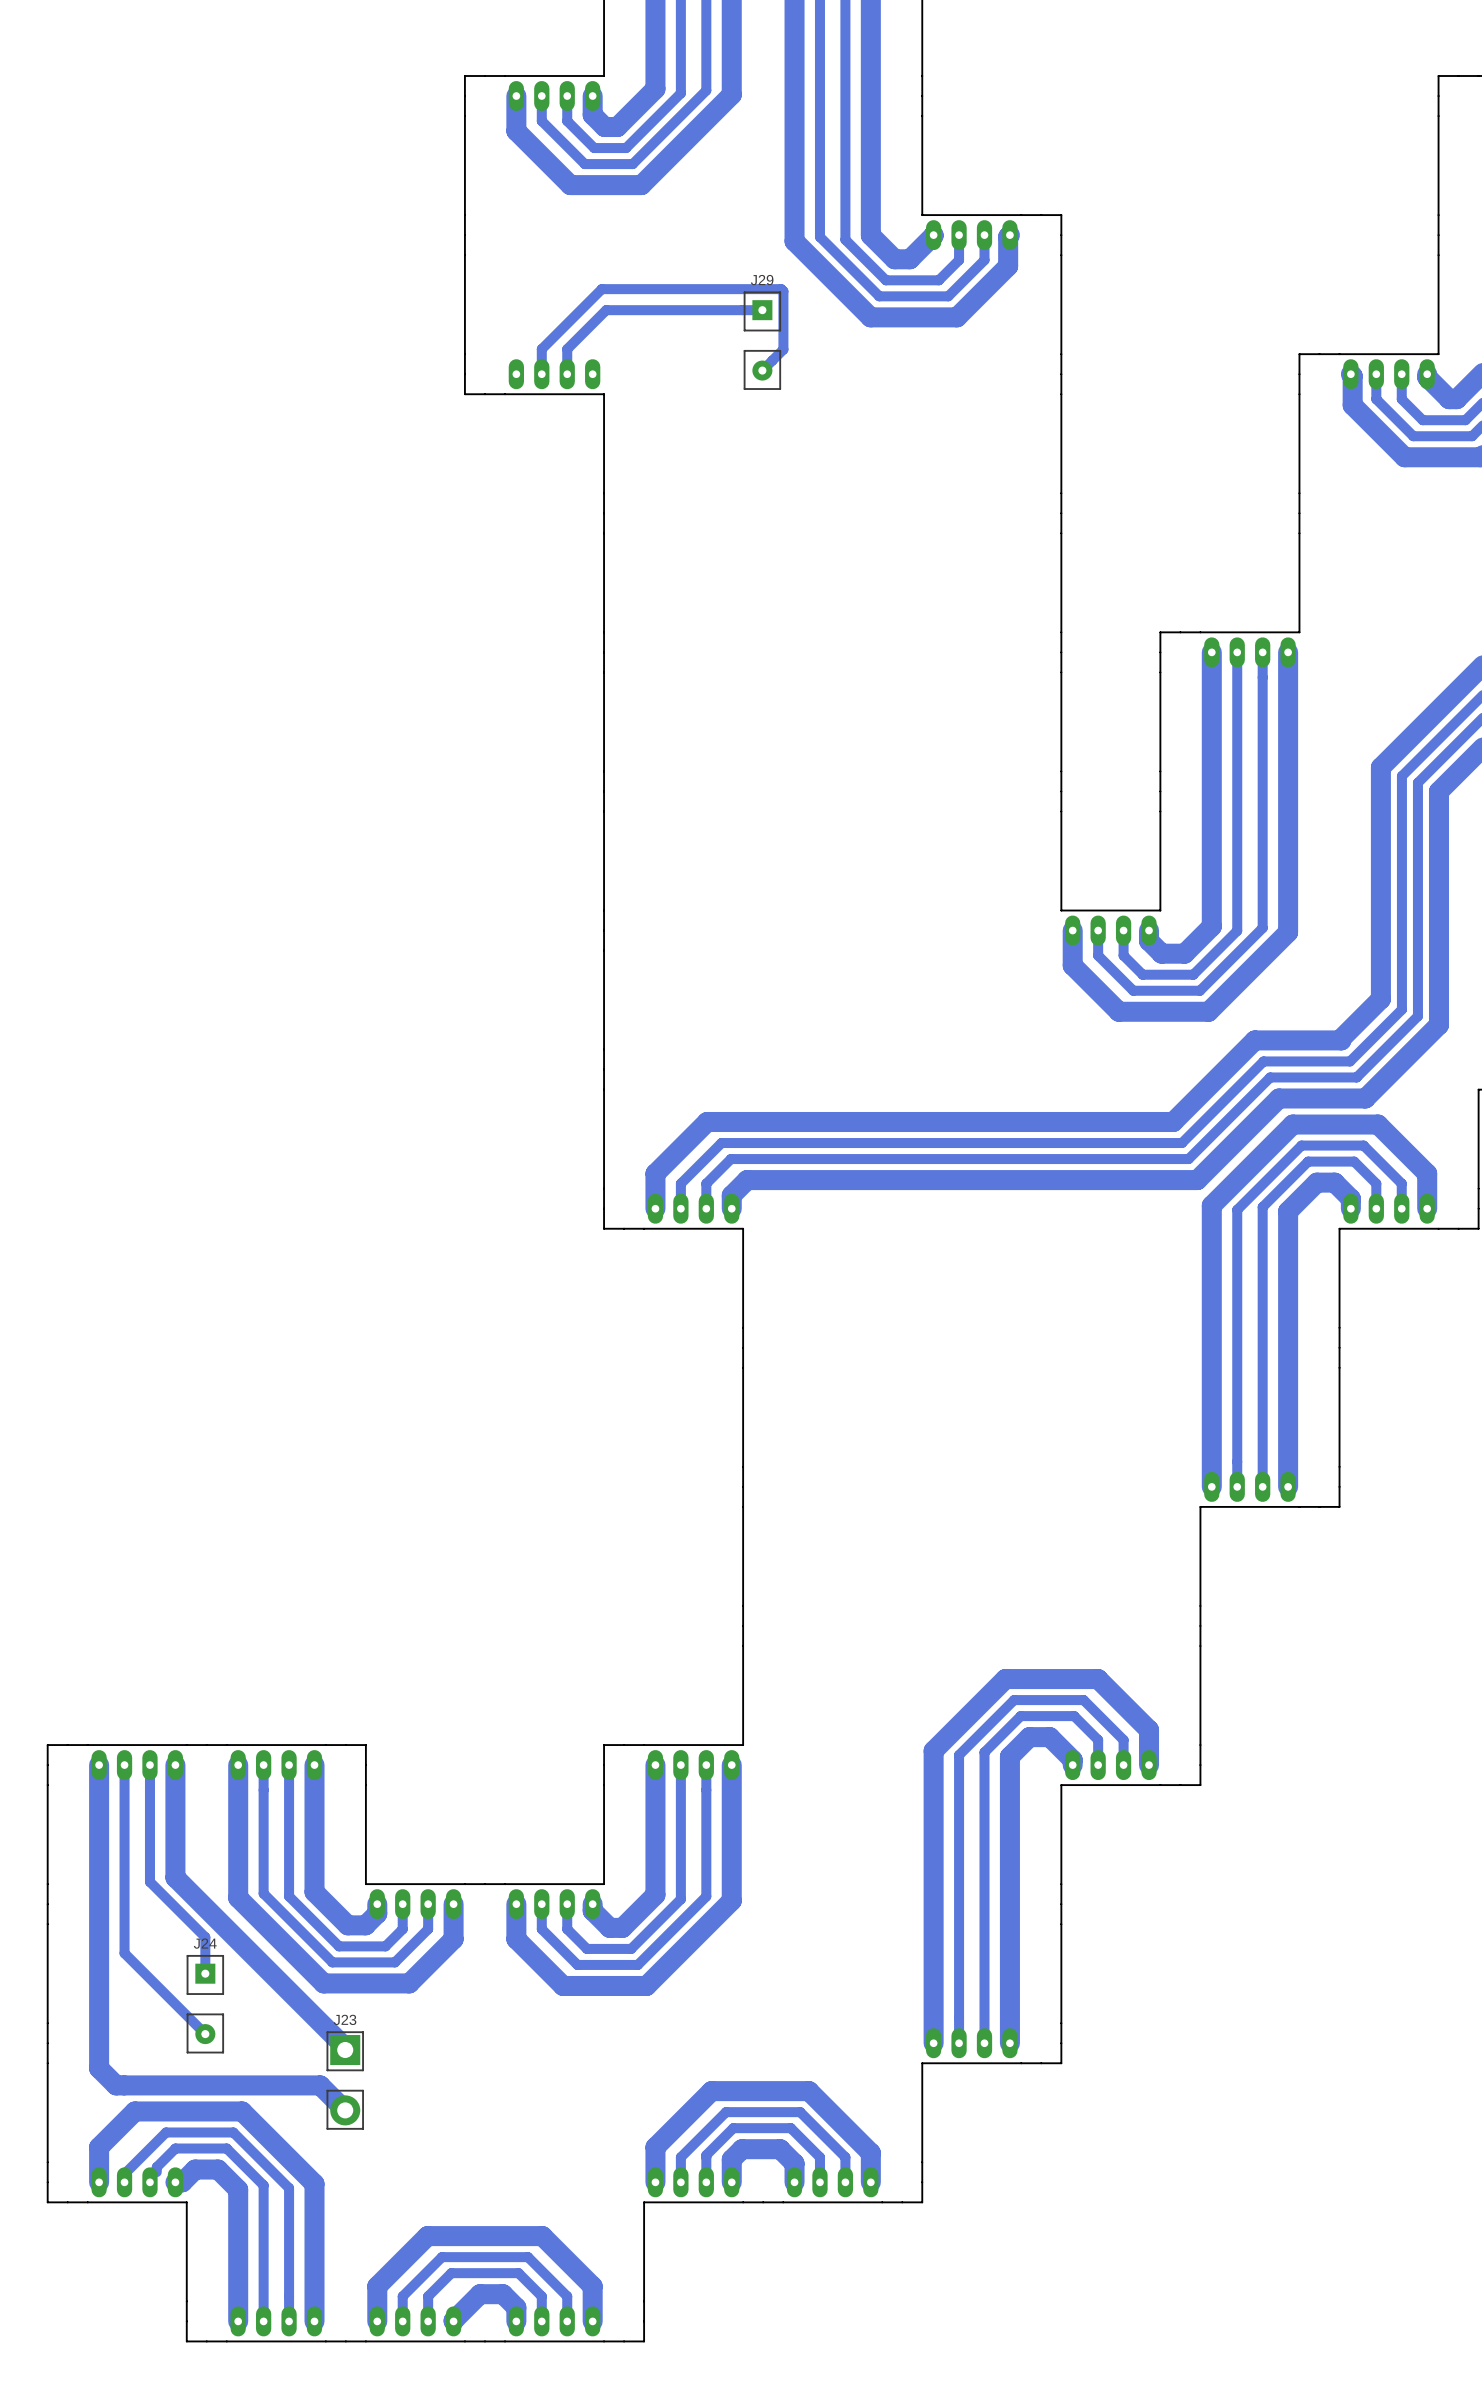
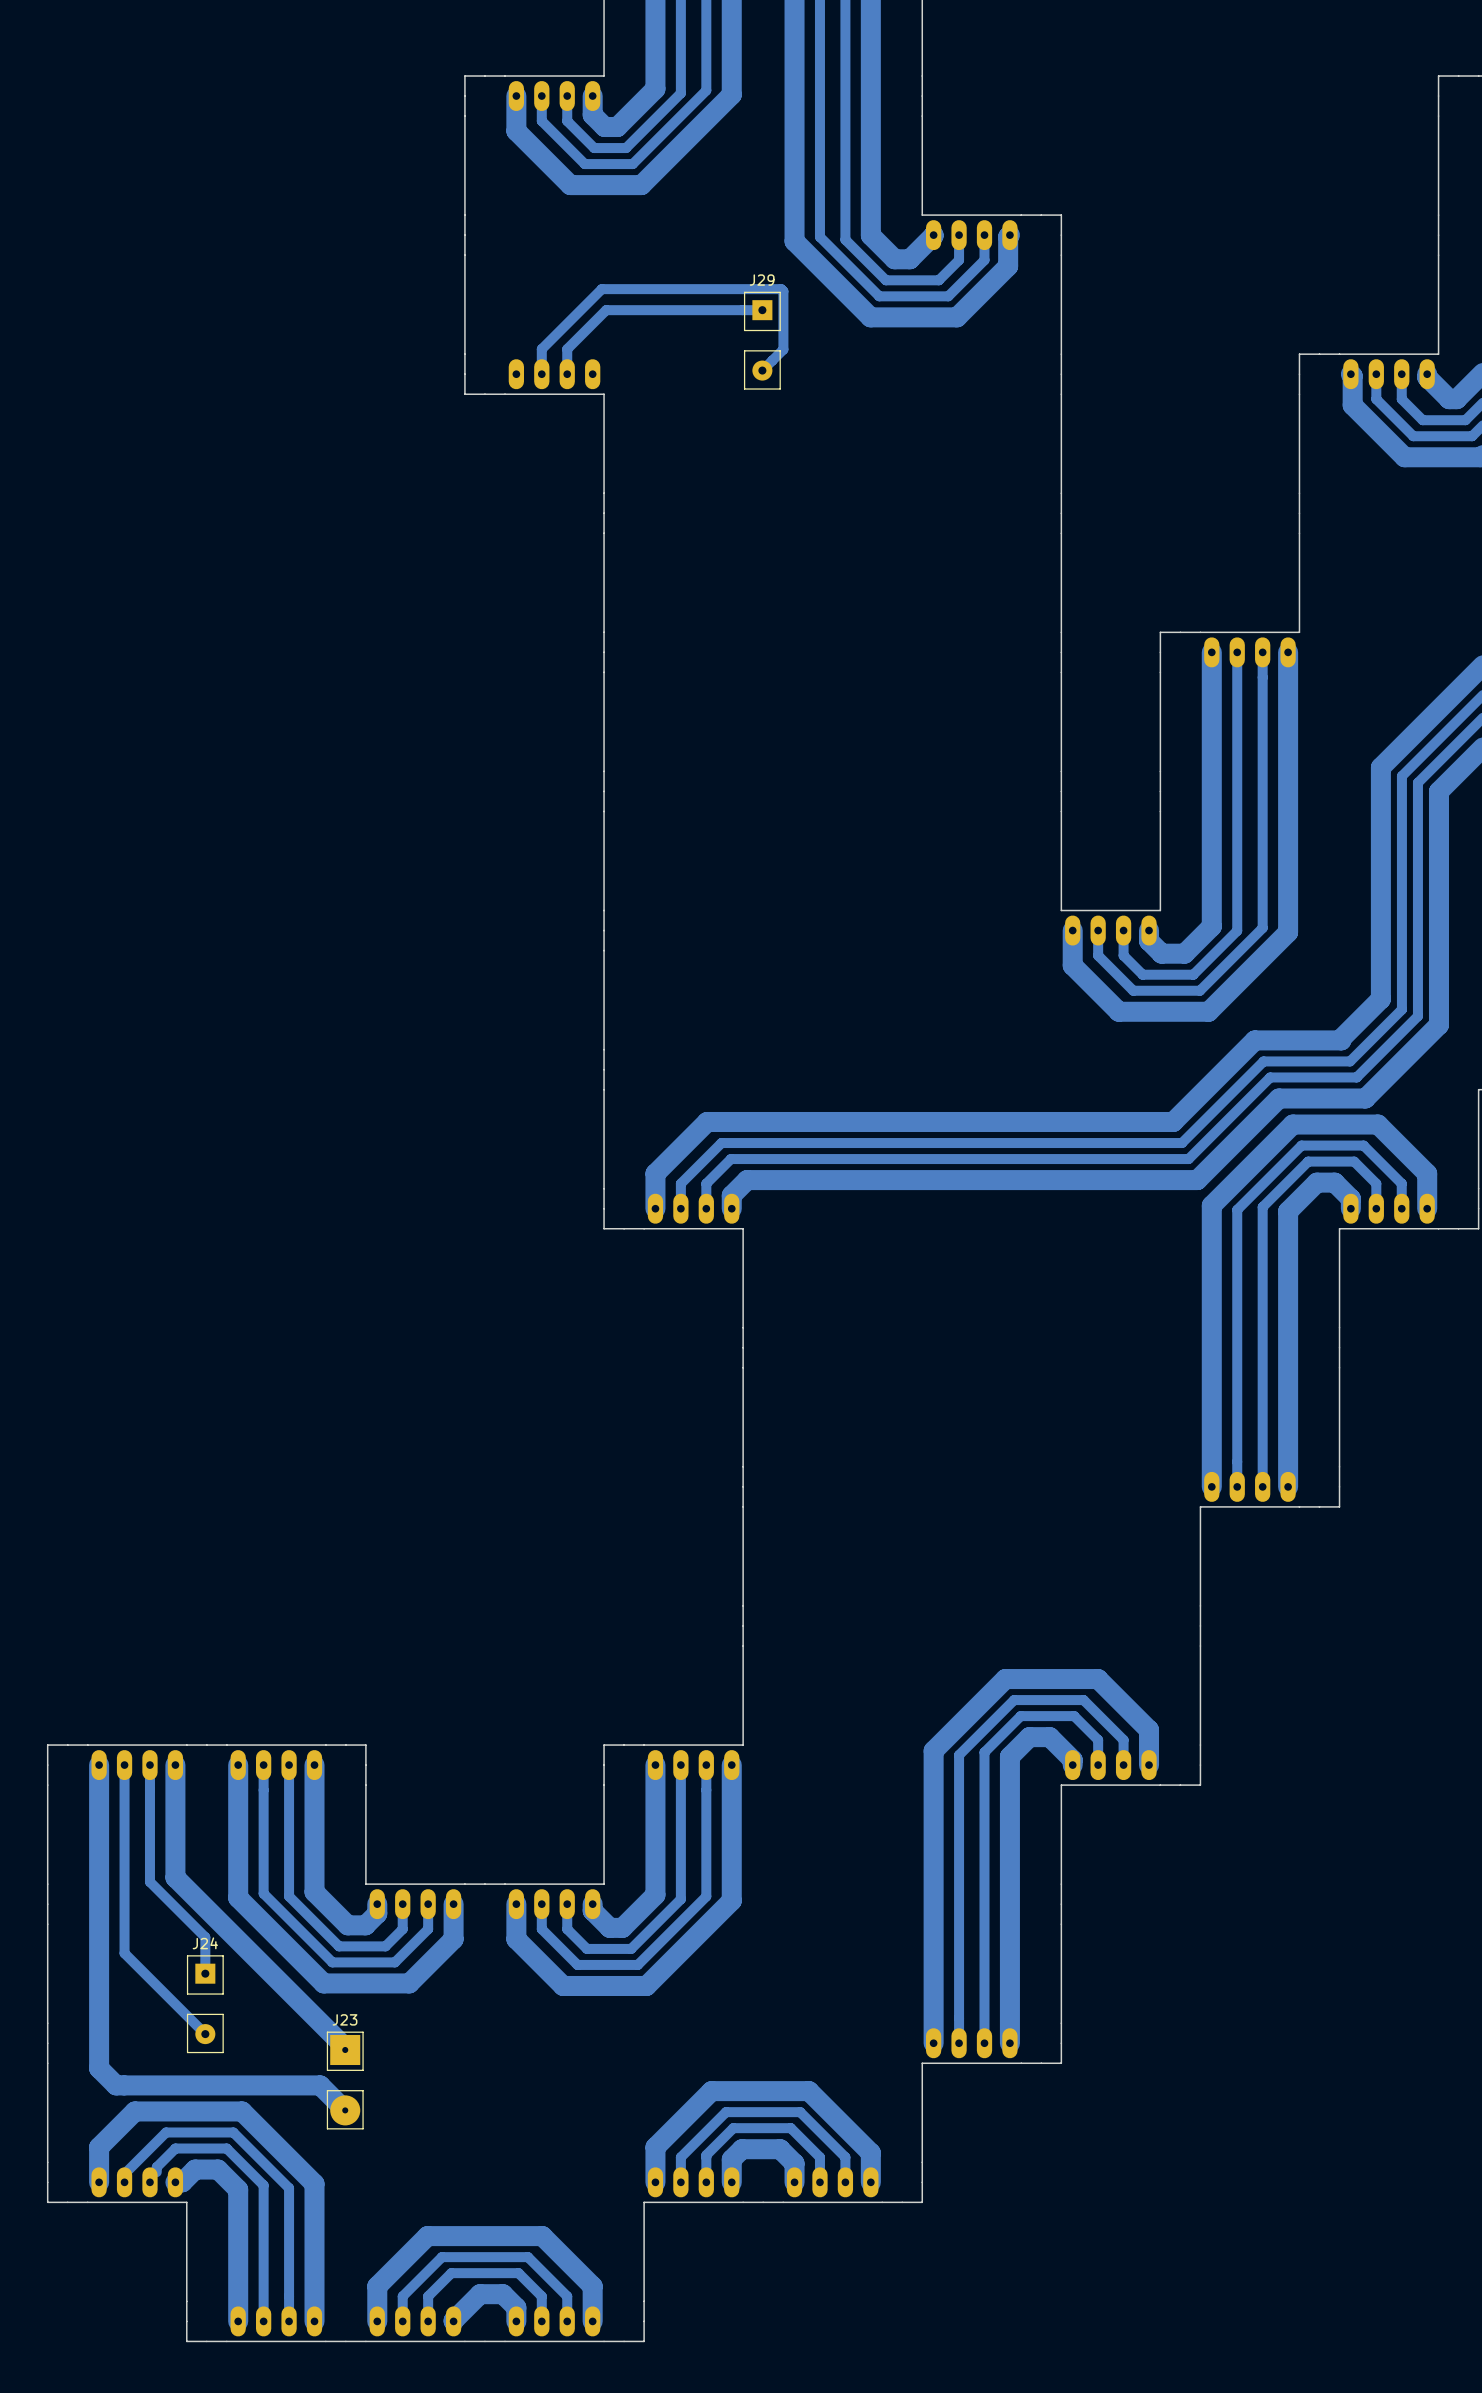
J23 footprint: [326, 2031, 364, 2130] -> [326, 2031, 364, 2130]

